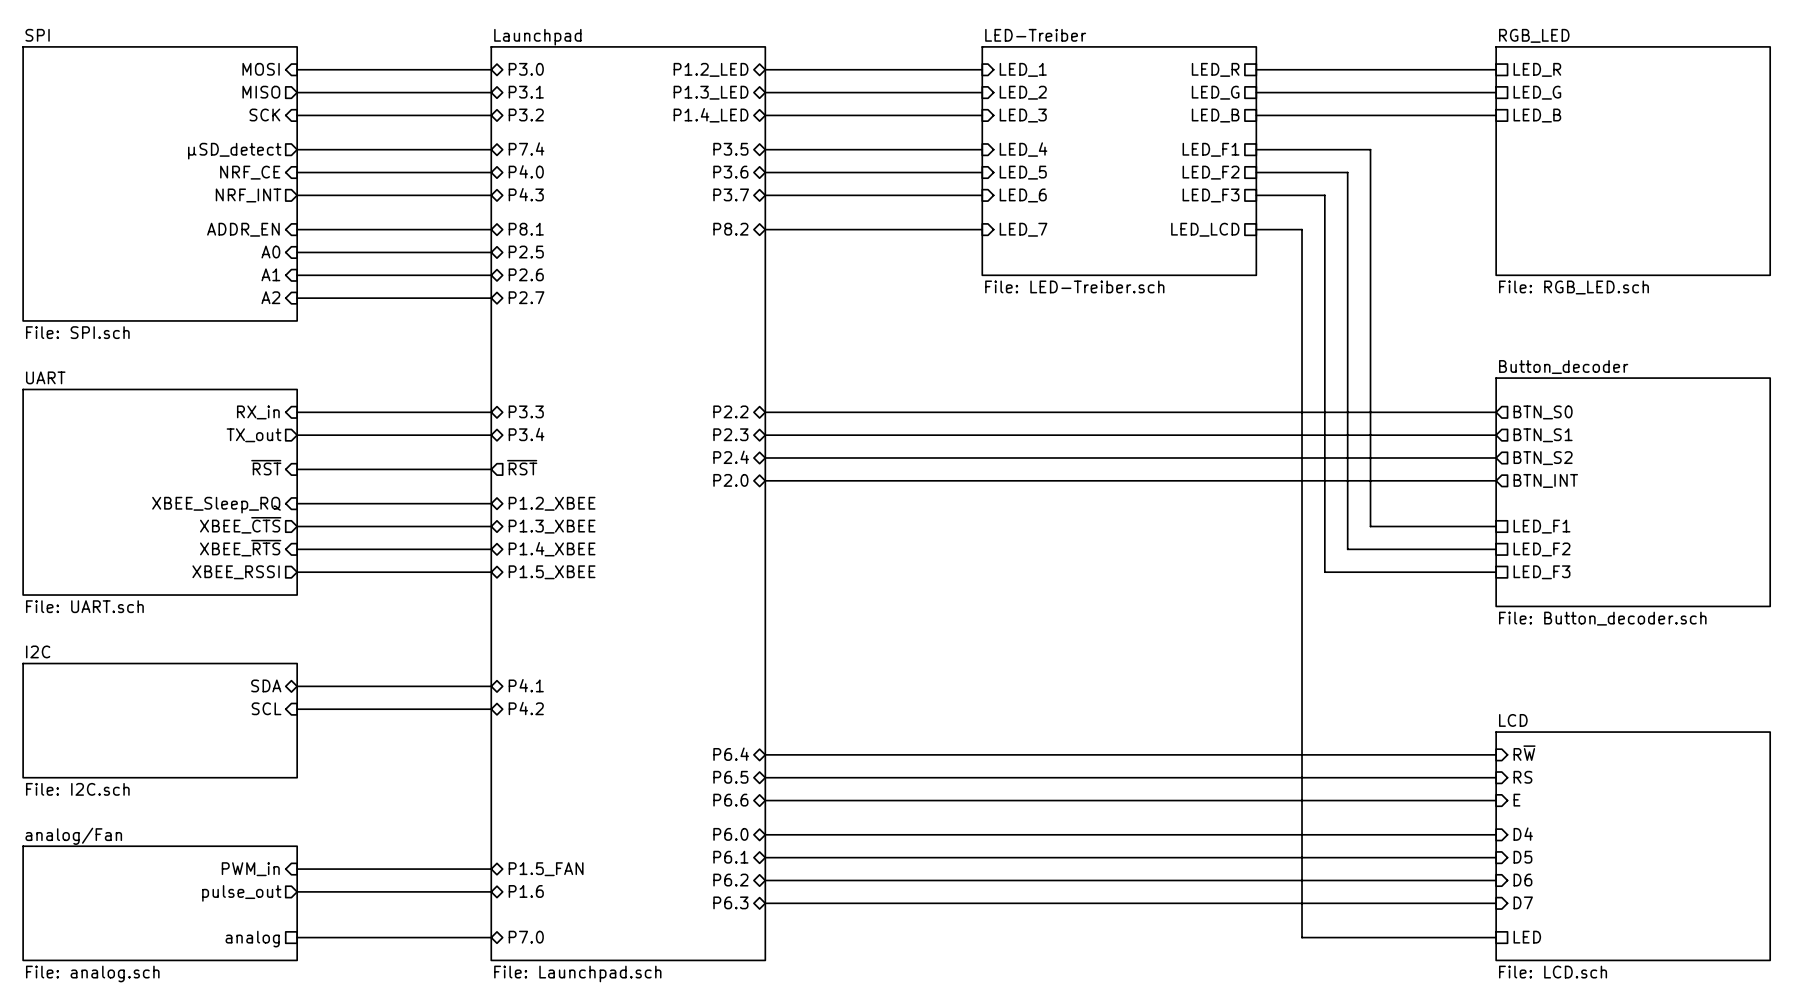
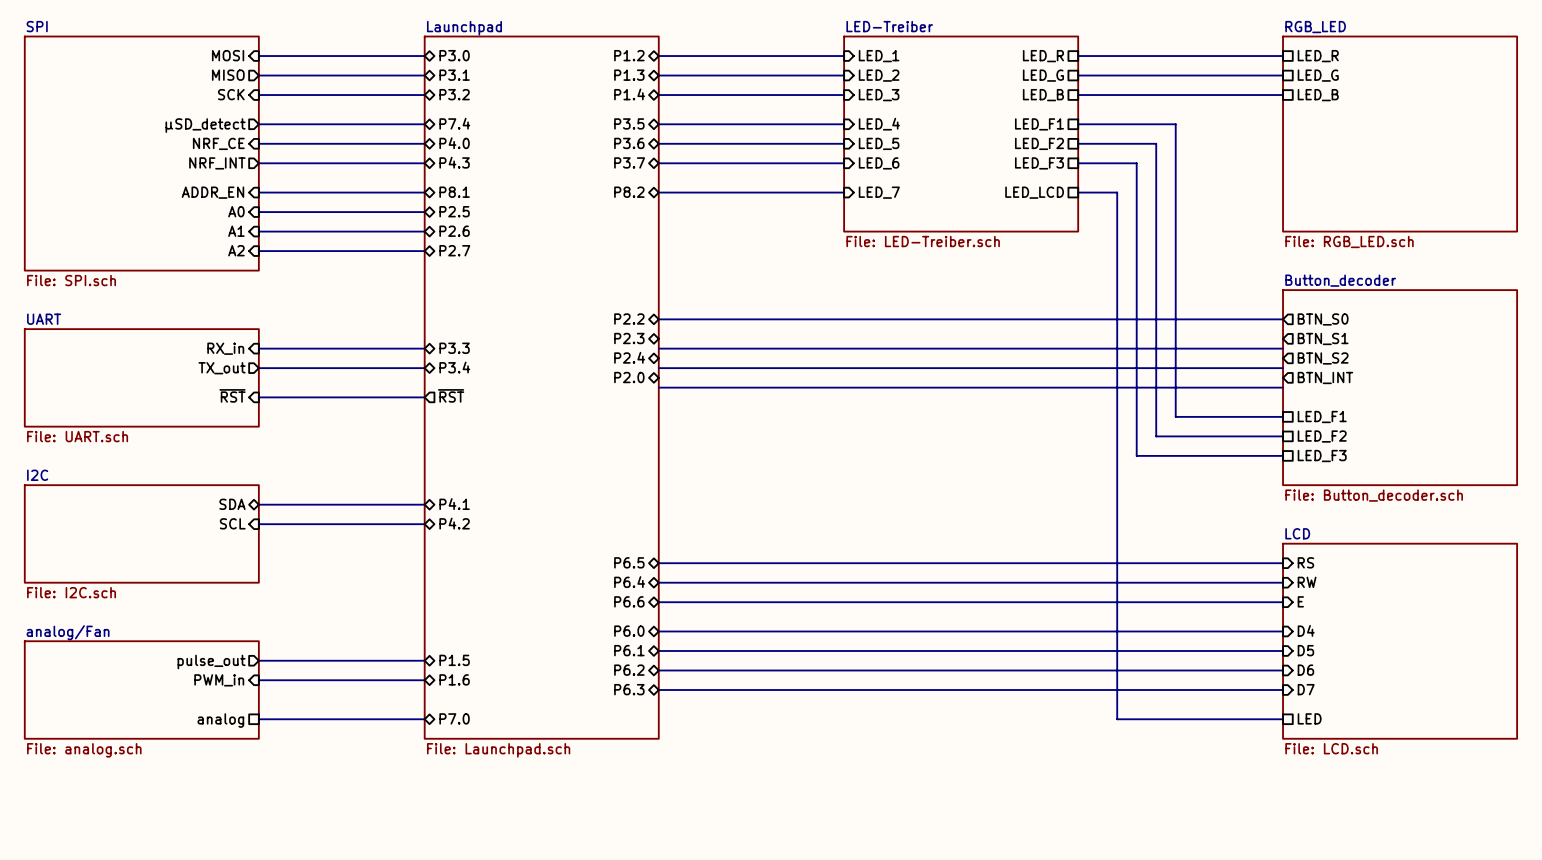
sheet pin: P1.2_LED (711, 69) -> P1.2 (629, 55)
sheet pin: P1.3_LED (711, 92) -> P1.3 (629, 75)
sheet pin: P1.4_LED (711, 115) -> P1.4 (629, 94)
sheet pin position: P2.2 (730, 411) -> P2.2 (629, 319)
sheet pin position: BTN_S0 (1543, 412) -> BTN_S0 (1323, 319)
sheet pin position: P2.3 (730, 434) -> P2.3 (629, 338)
sheet pin position: BTN_S1 (1543, 435) -> BTN_S1 (1323, 338)
sheet UART: none -> File: UART.sch (141, 377)
sheet Launchpad: none -> File: Launchpad.sch (541, 387)
sheet pin position: P2.4 (731, 457) -> P2.4 (629, 357)
sheet pin position: BTN_S2 (1543, 458) -> BTN_S2 (1323, 358)
sheet pin position: P2.0 (730, 480) -> P2.0 (629, 377)
wire: (765, 480) (1496, 480) -> (658, 319) (1283, 319)
sheet pin position: BTN_INT (1545, 480) -> BTN_INT (1325, 377)
sheet UART: File: UART.sch (160, 492) -> none
wire: (1370, 492) (1370, 526) (1496, 526) -> (1175, 416) (1283, 416)
sheet Button_decoder position: (1633, 492) -> (1400, 387)
wire: (297, 503) (491, 503) -> none
sheet pin: P1.2_XBEE (552, 503) -> none
sheet Launchpad: File: Launchpad.sch (628, 503) -> none
sheet pin: XBEE_Sleep_RQ (216, 505) -> none
wire: (1347, 515) (1347, 549) (1496, 549) -> (1156, 436) (1283, 436)
sheet pin: XBEE_~{CTS} (240, 525) -> none
wire: (297, 526) (491, 526) -> none
sheet pin: P1.3_XBEE (552, 526) -> none
sheet pin position: LED_F1 (1541, 526) -> LED_F1 (1322, 417)
wire: (1324, 537) (1324, 572) (1496, 572) -> (1136, 455) (1283, 455)
sheet pin: XBEE_~{RTS} (240, 548) -> none
wire: (297, 549) (491, 549) -> none
sheet pin: P1.4_XBEE (552, 549) -> none
sheet pin position: LED_F2 (1541, 549) -> LED_F2 (1322, 436)
sheet pin: XBEE_RSSI (236, 572) -> none
wire: (297, 572) (491, 572) -> none
sheet pin: P1.5_XBEE (552, 572) -> none
sheet pin position: LED_F3 (1541, 572) -> LED_F3 (1322, 456)
sheet pin position: SDA (266, 685) -> SDA (232, 504)
sheet pin position: P4.1 (526, 685) -> P4.1 (454, 504)
sheet pin: none -> RW (1307, 582)
wire: (297, 686) (491, 686) -> (258, 504) (424, 504)
sheet pin position: SCL (266, 708) -> SCL (232, 523)
sheet pin position: P4.2 (526, 708) -> P4.2 (454, 523)
wire: (297, 709) (491, 709) -> (258, 524) (424, 524)
sheet I2C position: (160, 720) -> (141, 533)
sheet pin: R~{W} (1524, 753) -> none
sheet pin position: P6.4 (731, 754) -> P6.4 (629, 582)
wire: (765, 754) (1496, 754) -> (658, 563) (1283, 563)
sheet pin: none -> P1.5 (454, 660)
sheet pin position: P6.5 (730, 777) -> P6.5 (629, 562)
wire: (765, 777) (1496, 777) -> (658, 582) (1283, 582)
sheet pin position: RS (1522, 777) -> RS (1305, 562)
sheet pin position: P6.6 (730, 800) -> P6.6 (629, 601)
wire: (765, 800) (1496, 800) -> (658, 602) (1283, 602)
sheet pin position: E (1516, 800) -> E (1300, 601)
sheet pin position: P6.0 (730, 834) -> P6.0 (629, 631)
wire: (765, 834) (1496, 834) -> (658, 631) (1283, 631)
sheet pin position: D4 (1523, 834) -> D4 (1306, 630)
wire: (1302, 846) (1302, 937) (1496, 937) -> (1117, 719) (1283, 719)
sheet LCD position: (1633, 846) -> (1400, 641)
sheet pin position: P6.1 (730, 857) -> P6.1 (629, 650)
wire: (765, 857) (1496, 857) -> (658, 650) (1283, 650)
sheet pin position: D5 (1522, 857) -> D5 (1305, 650)
sheet pin position: PWM_in (250, 869) -> PWM_in (219, 680)
wire: (297, 869) (491, 869) -> (258, 660) (424, 660)
sheet pin: P1.5_FAN (546, 869) -> none
sheet pin position: P6.2 (730, 880) -> P6.2 (629, 670)
wire: (765, 880) (1496, 880) -> (658, 670) (1283, 670)
sheet pin position: D6 (1522, 880) -> D6 (1305, 670)
wire: (297, 891) (491, 891) -> (258, 680) (424, 680)
sheet pin position: P1.6 (526, 891) -> P1.6 (454, 679)
sheet pin position: pulse_out (241, 893) -> pulse_out (211, 662)
sheet pin position: P6.3 (730, 902) -> P6.3 (629, 689)
sheet pin position: D7 (1523, 902) -> D7 (1306, 689)
sheet analog/Fan position: (160, 903) -> (141, 690)
wire: (765, 903) (1496, 903) -> (658, 690) (1283, 690)
wire: (297, 937) (491, 937) -> (258, 719) (424, 719)
sheet pin position: P7.0 (526, 937) -> P7.0 (454, 718)
sheet pin position: LED (1527, 937) -> LED (1309, 718)
sheet pin position: analog (252, 939) -> analog (220, 720)

